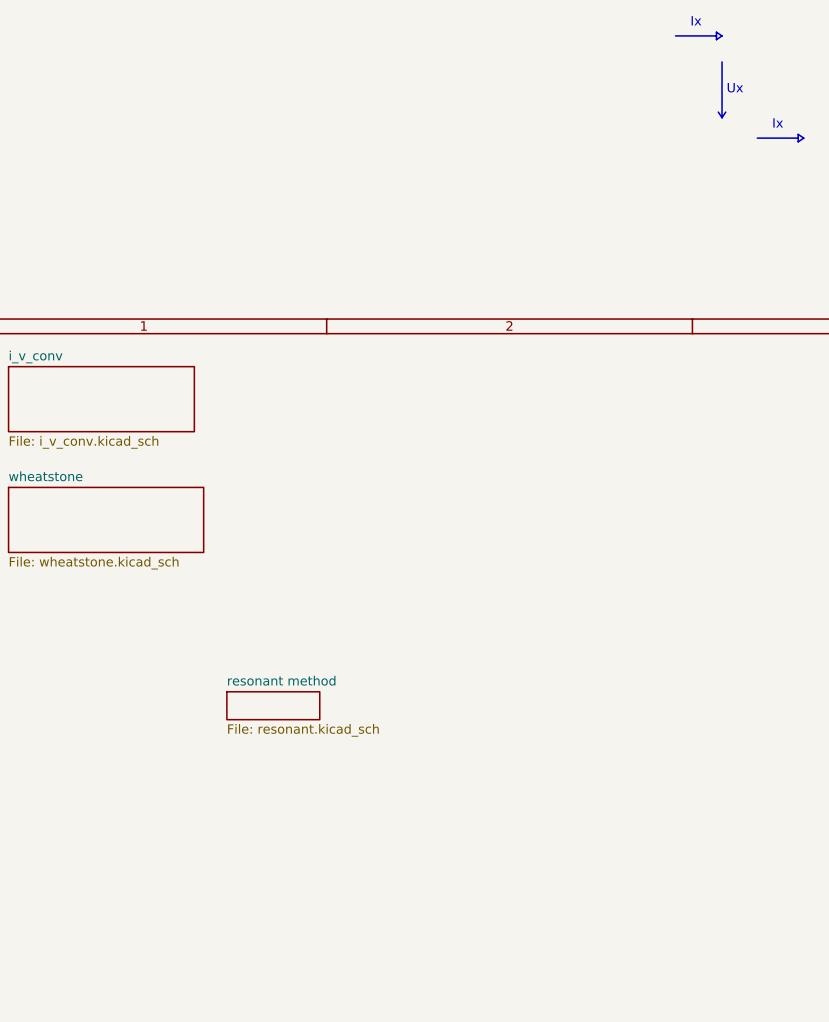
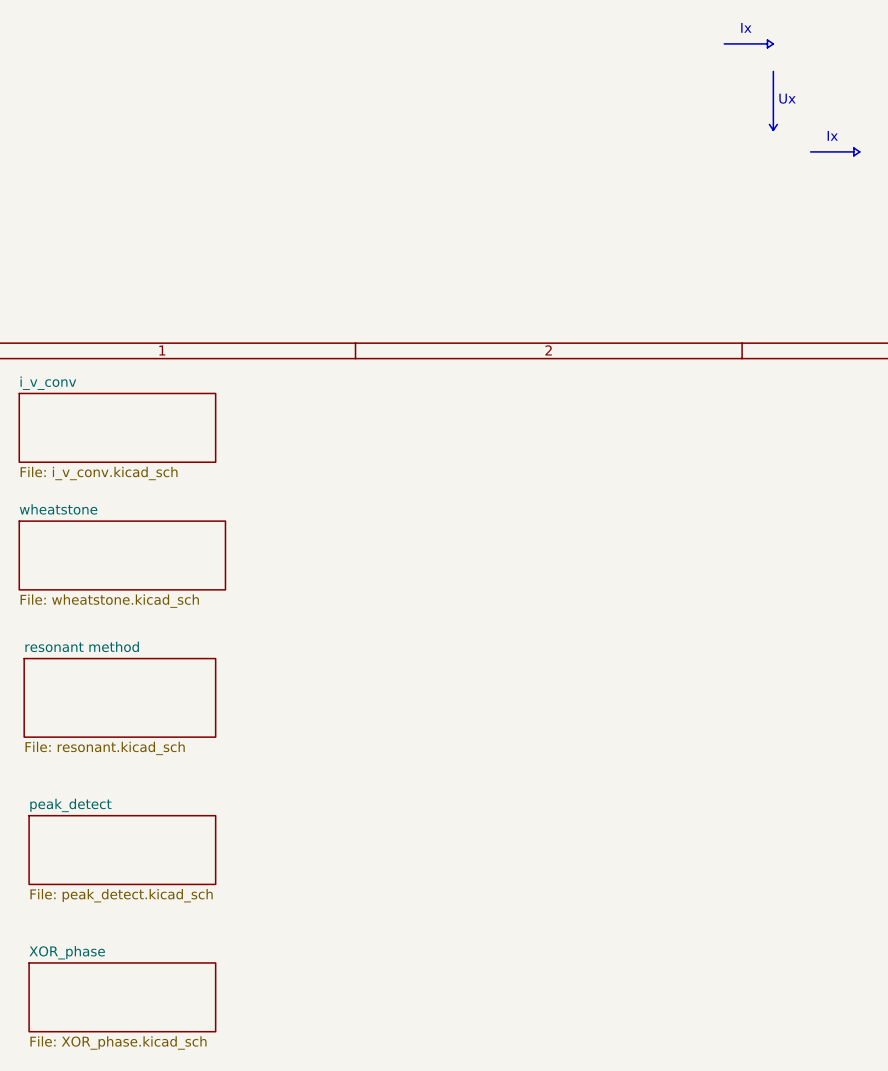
sheet resonant method: none -> File: resonant.kicad_sch (119, 697)
sheet resonant method: File: resonant.kicad_sch (273, 705) -> none
sheet peak_detect: none -> File: peak_detect.kicad_sch (122, 850)
sheet XOR_phase: none -> File: XOR_phase.kicad_sch (122, 997)

